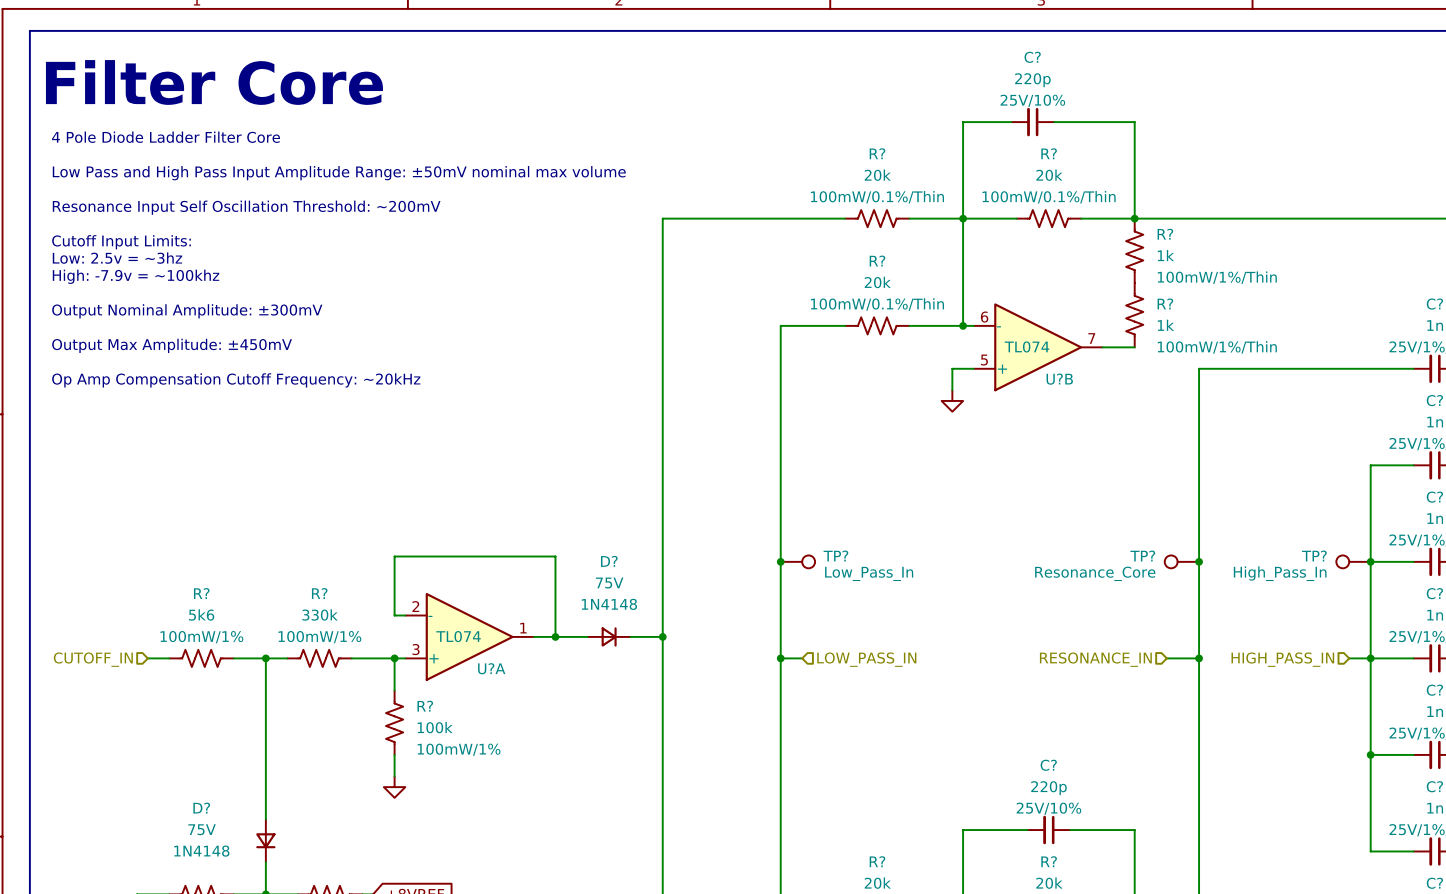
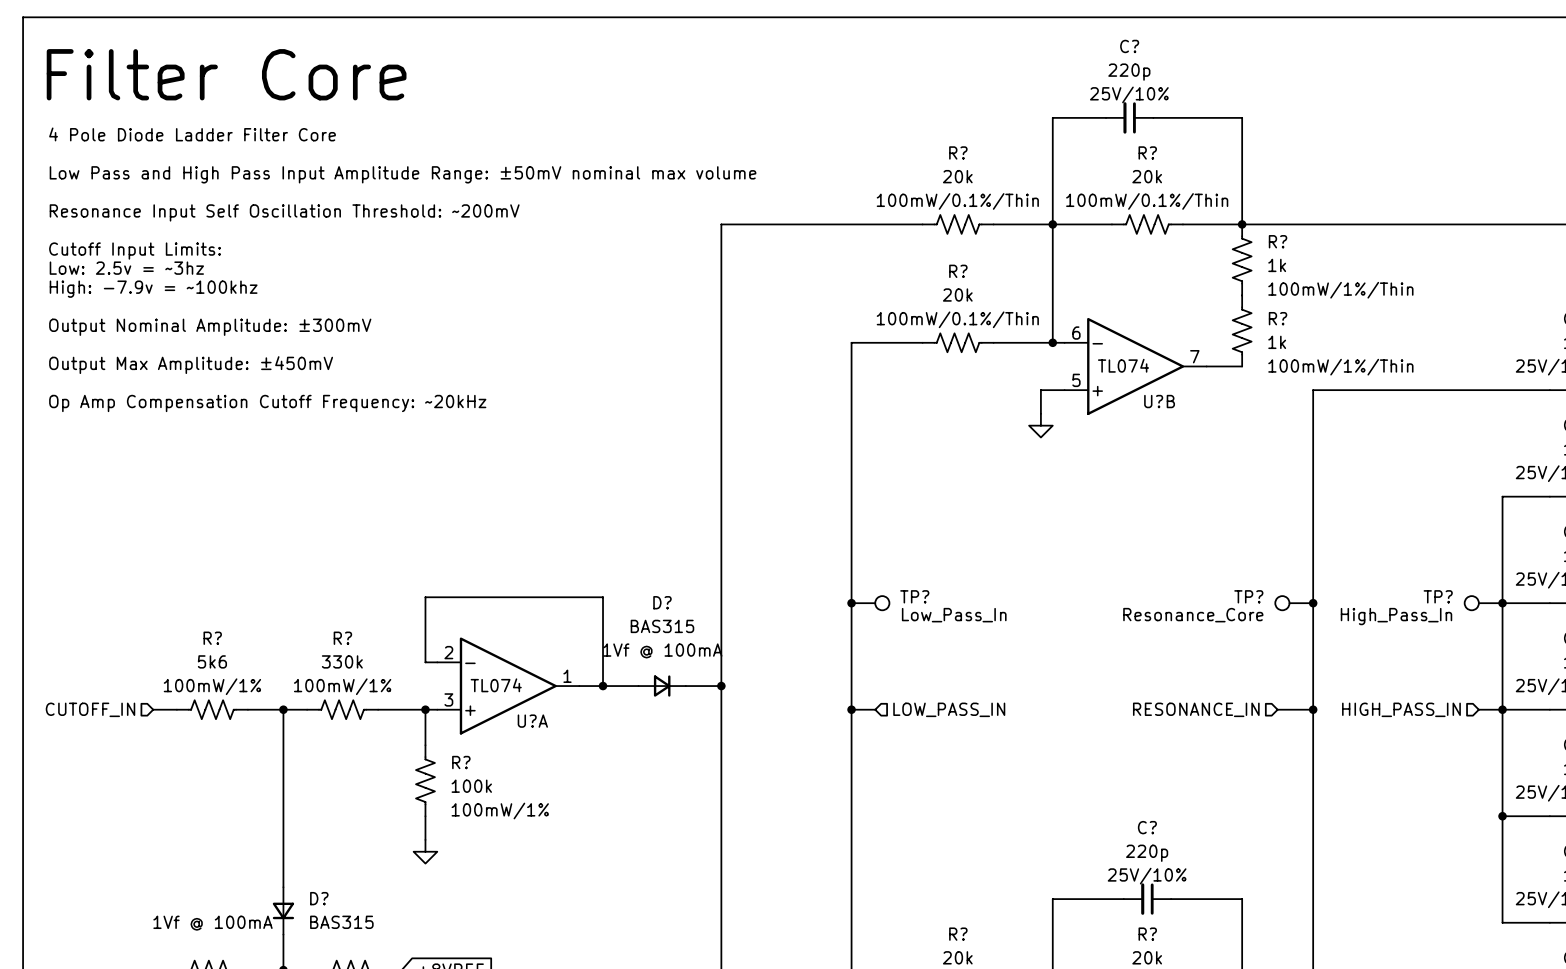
D? value: 75V (609, 583) -> BAS315 (662, 626)
D? text: 1N4148 (609, 604) -> 1Vf @ 100mA (662, 650)
D? name position: D? (201, 808) -> D? (319, 898)
D? value: 75V (202, 829) -> BAS315 (341, 922)
D? text: 1N4148 (201, 851) -> 1Vf @ 100mA (212, 923)

